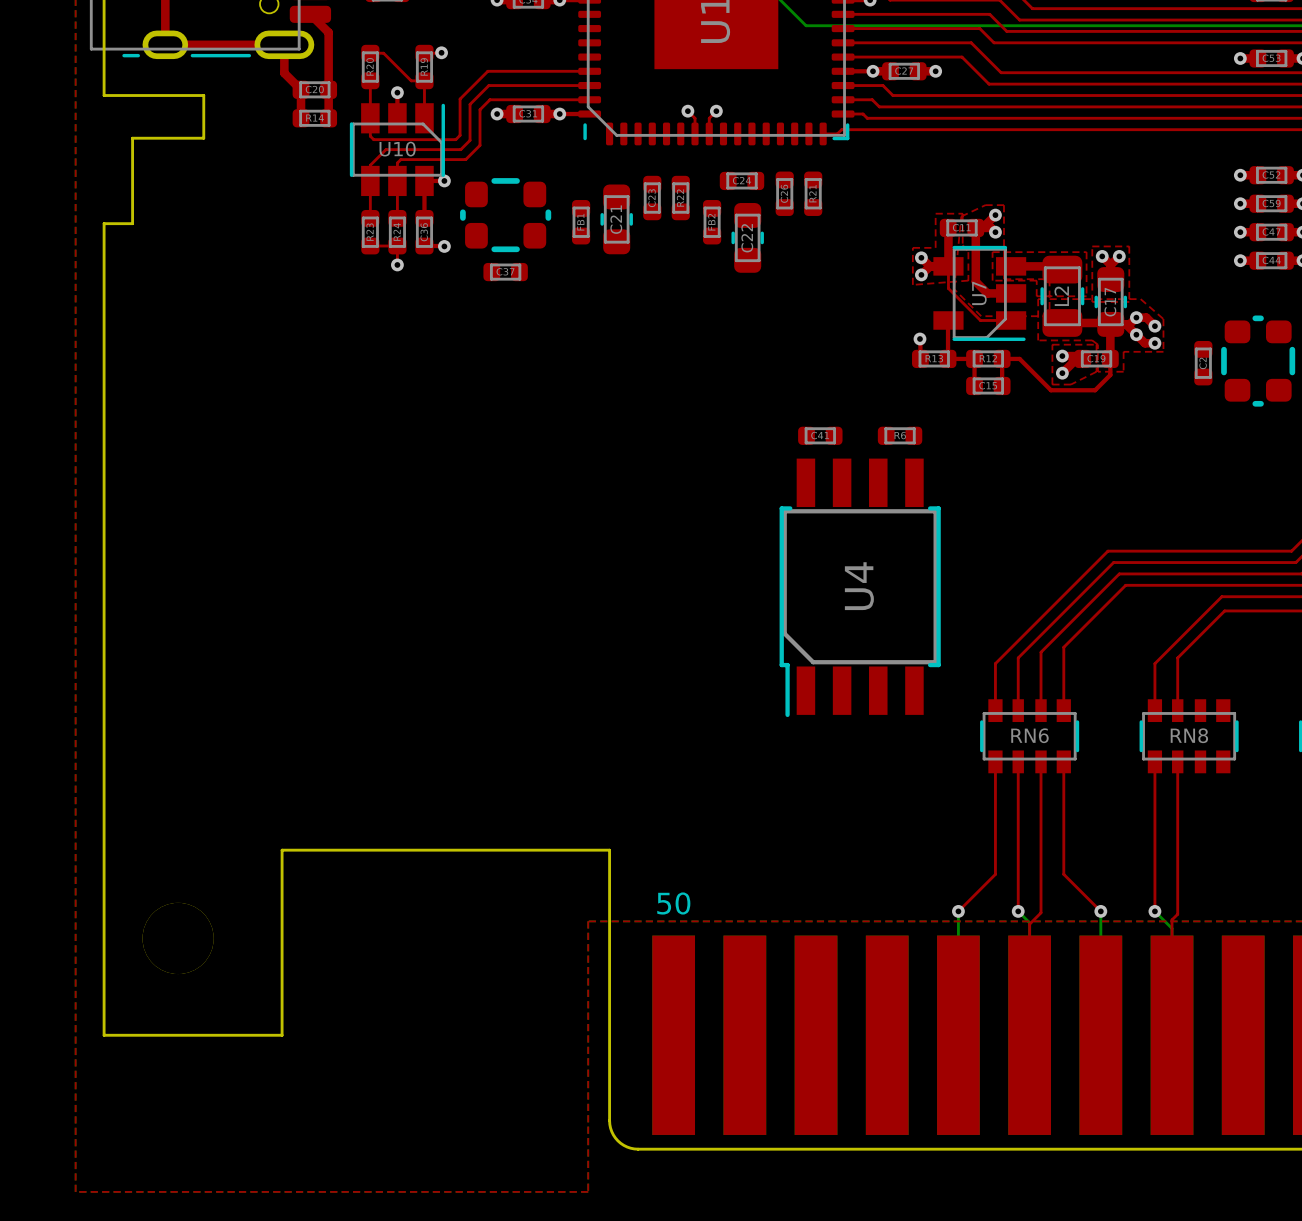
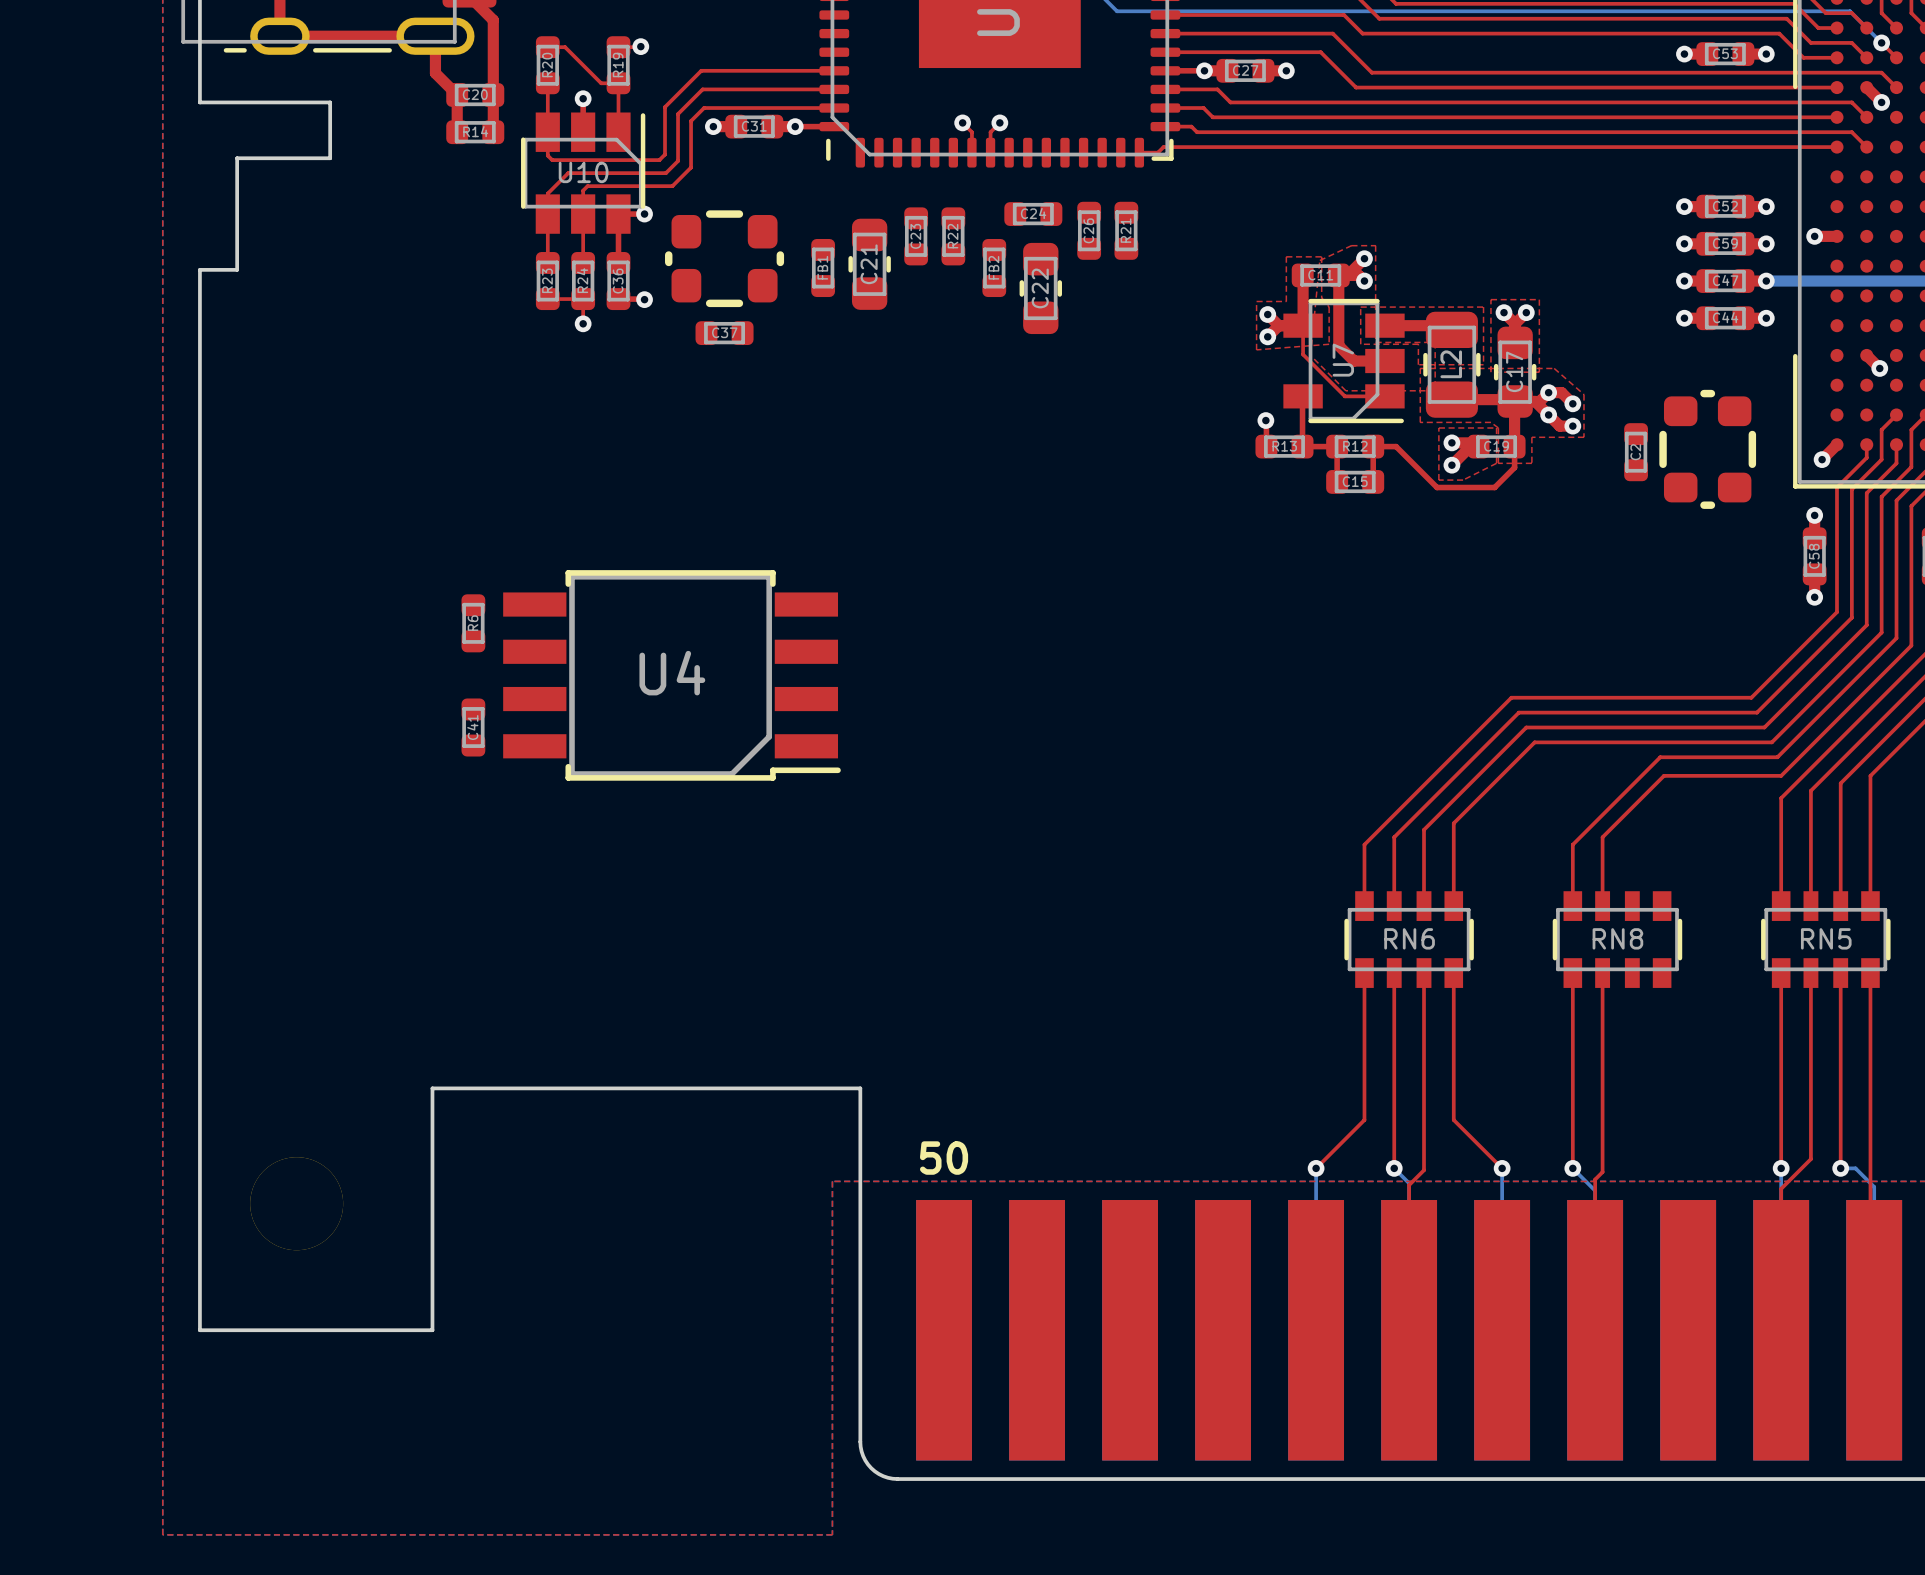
C41 rotation: 0° (820, 435) -> 90° clockwise (473, 727)
C41 position: (820, 435) -> (473, 727)
R6 rotation: 0° (900, 435) -> 90° clockwise (473, 623)
R6 position: (900, 435) -> (473, 623)
U4 rotation: 0° (860, 587) -> 90° counterclockwise (671, 675)
U4 position: (860, 587) -> (671, 675)

